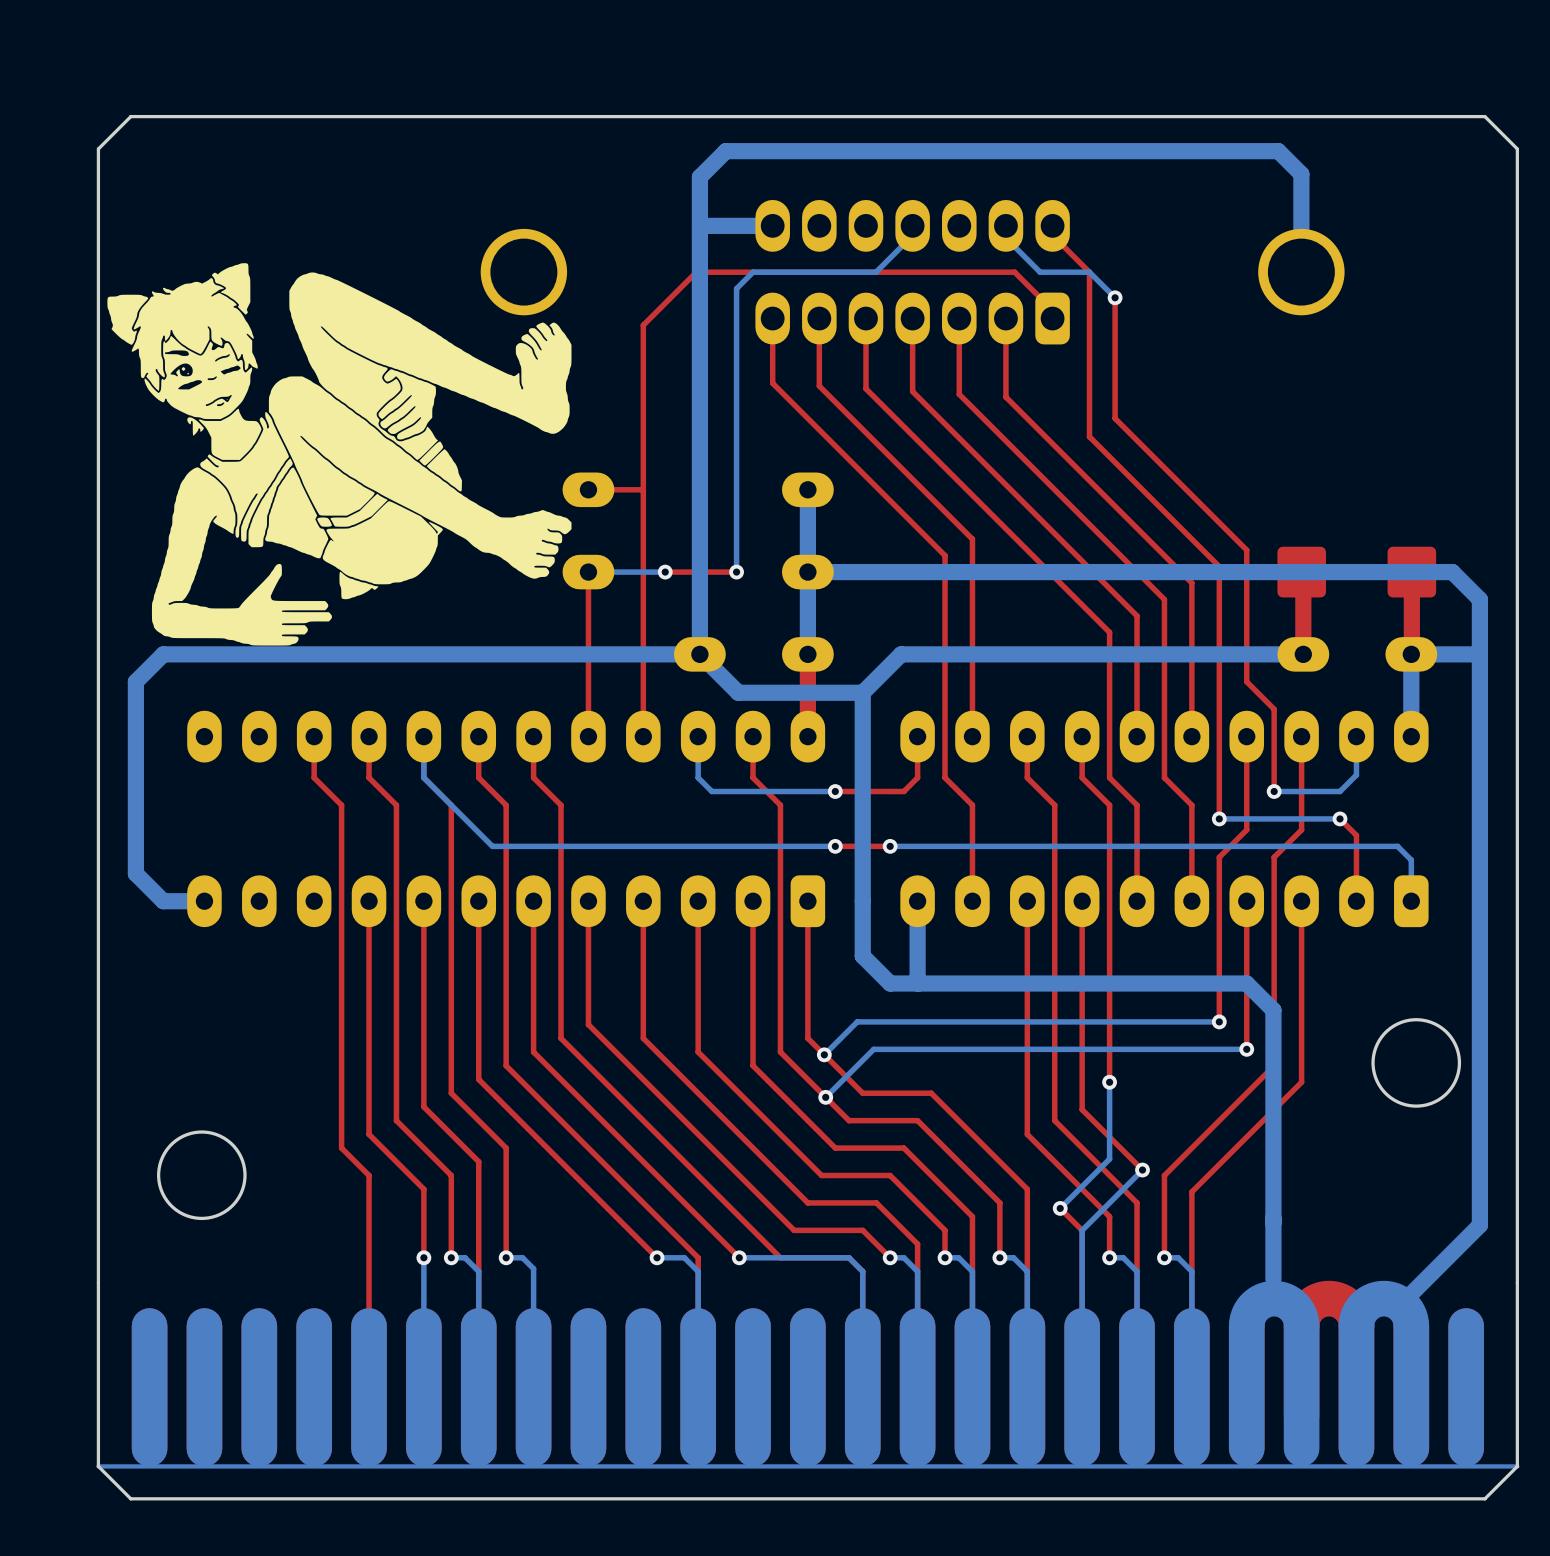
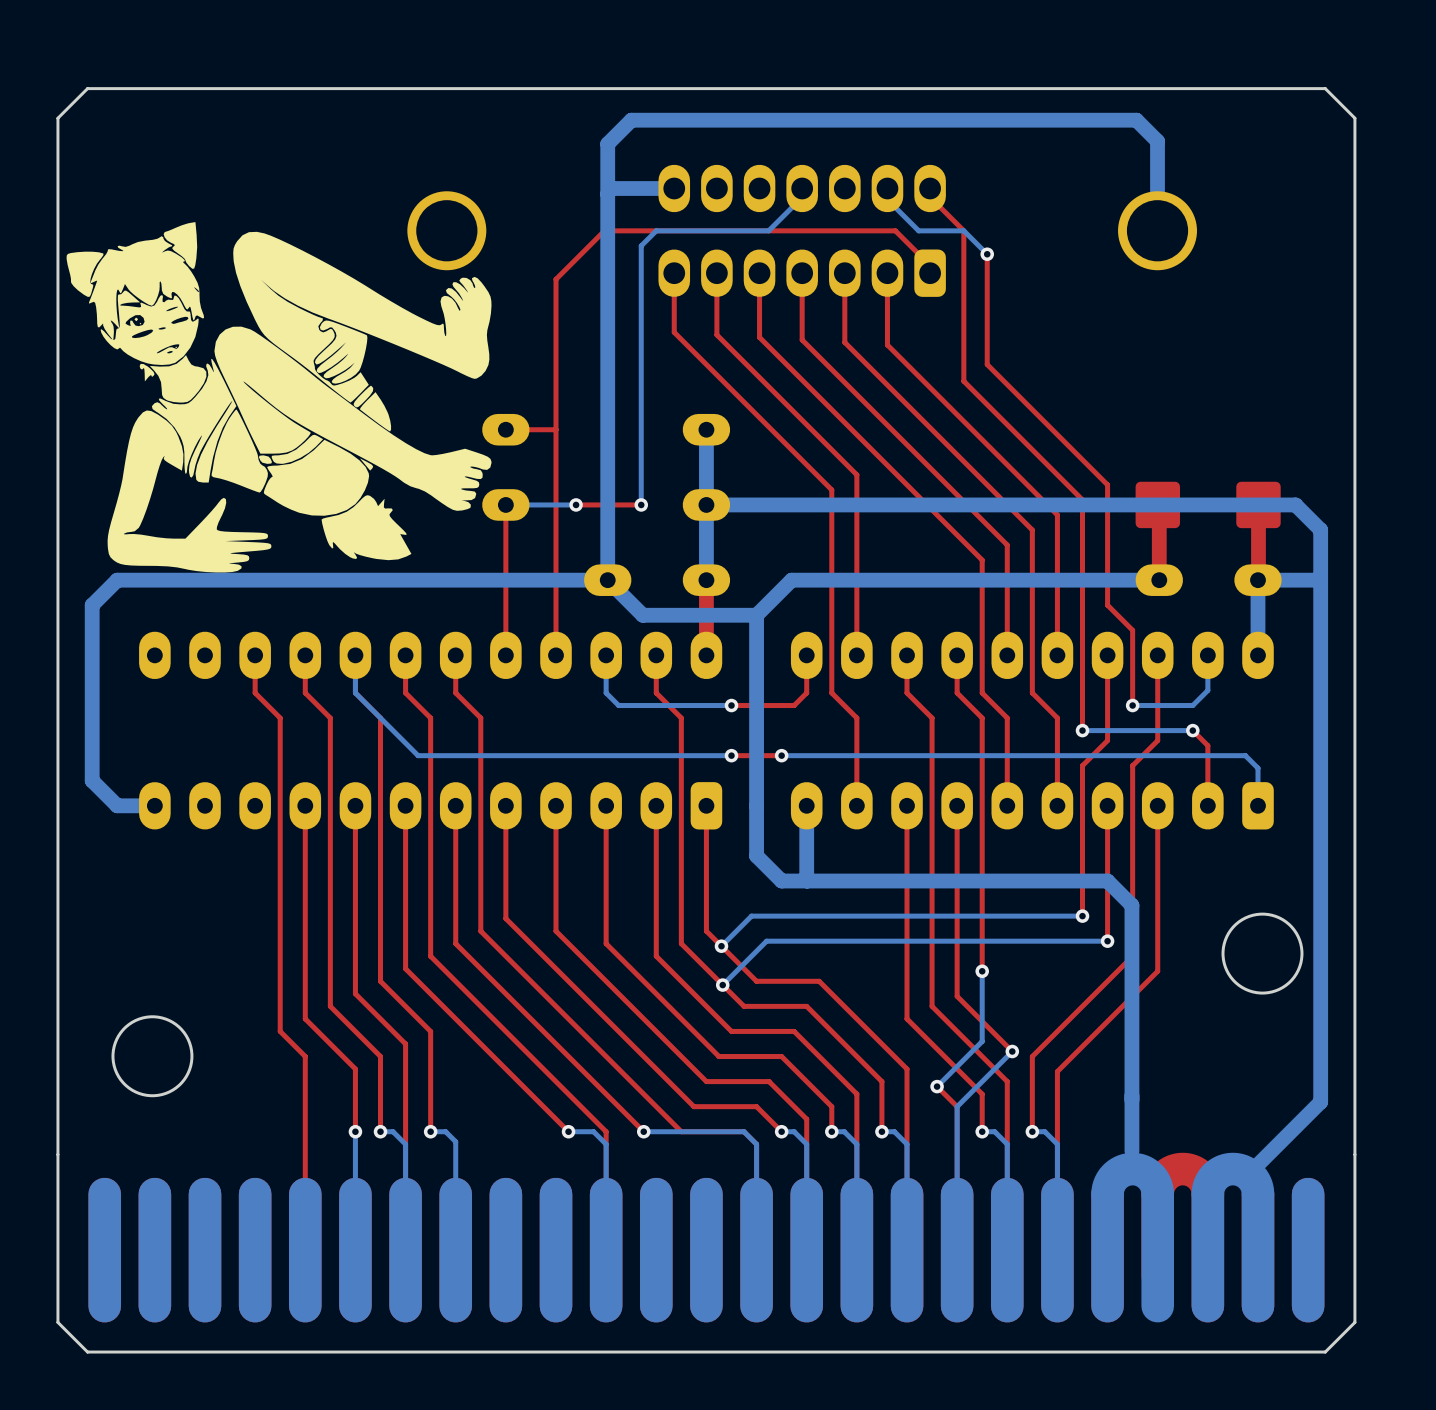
drawing shape: [107, 263, 572, 646] -> [66, 222, 492, 573]
bottom track: (1517, 1466) (98, 1466) -> none

